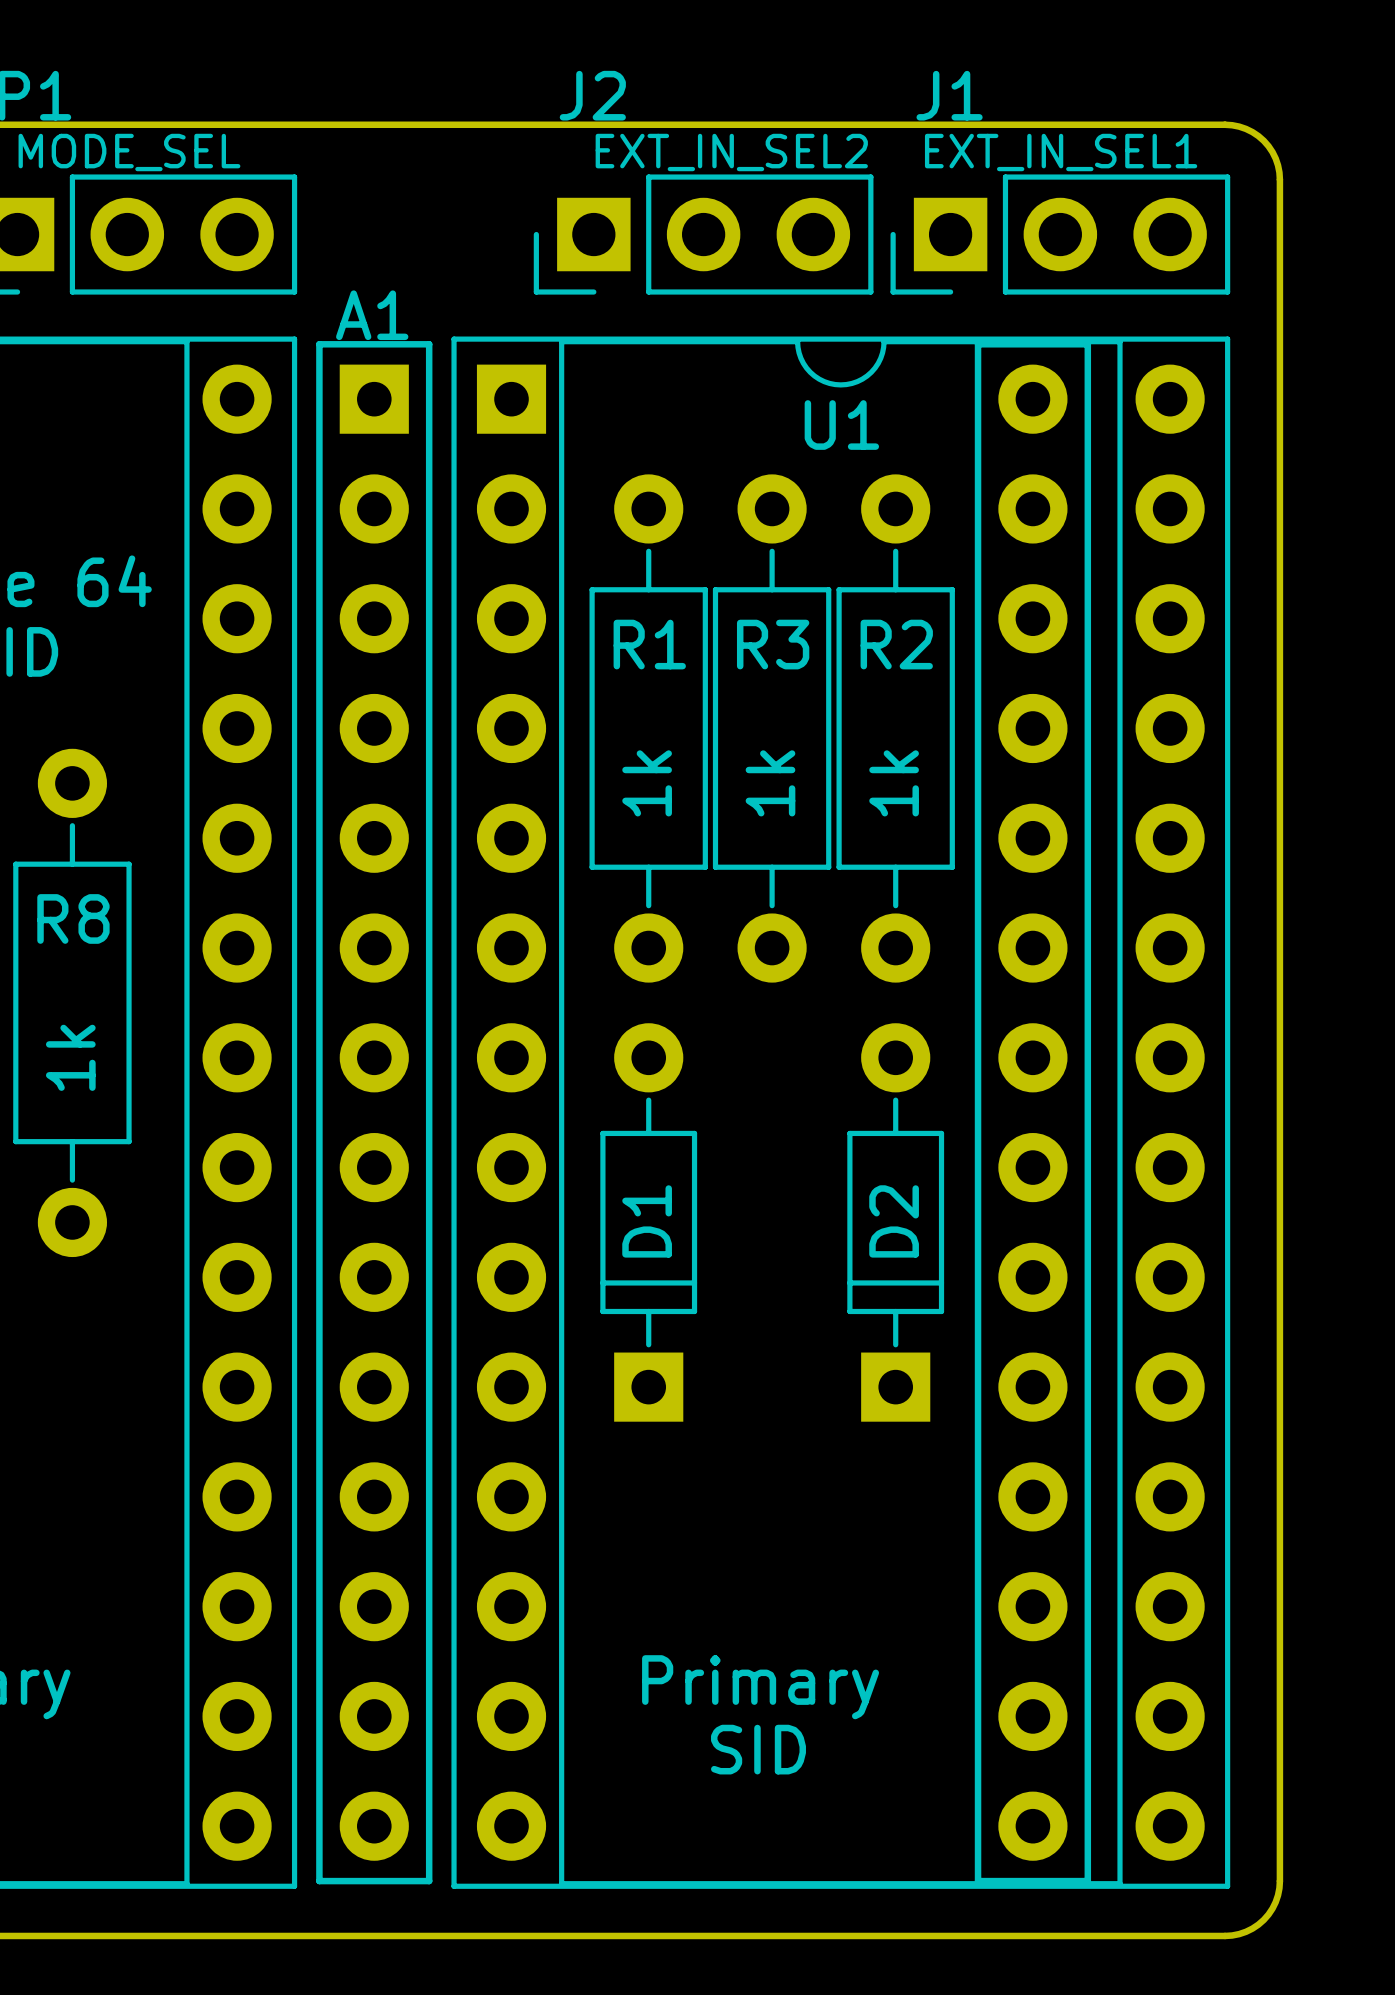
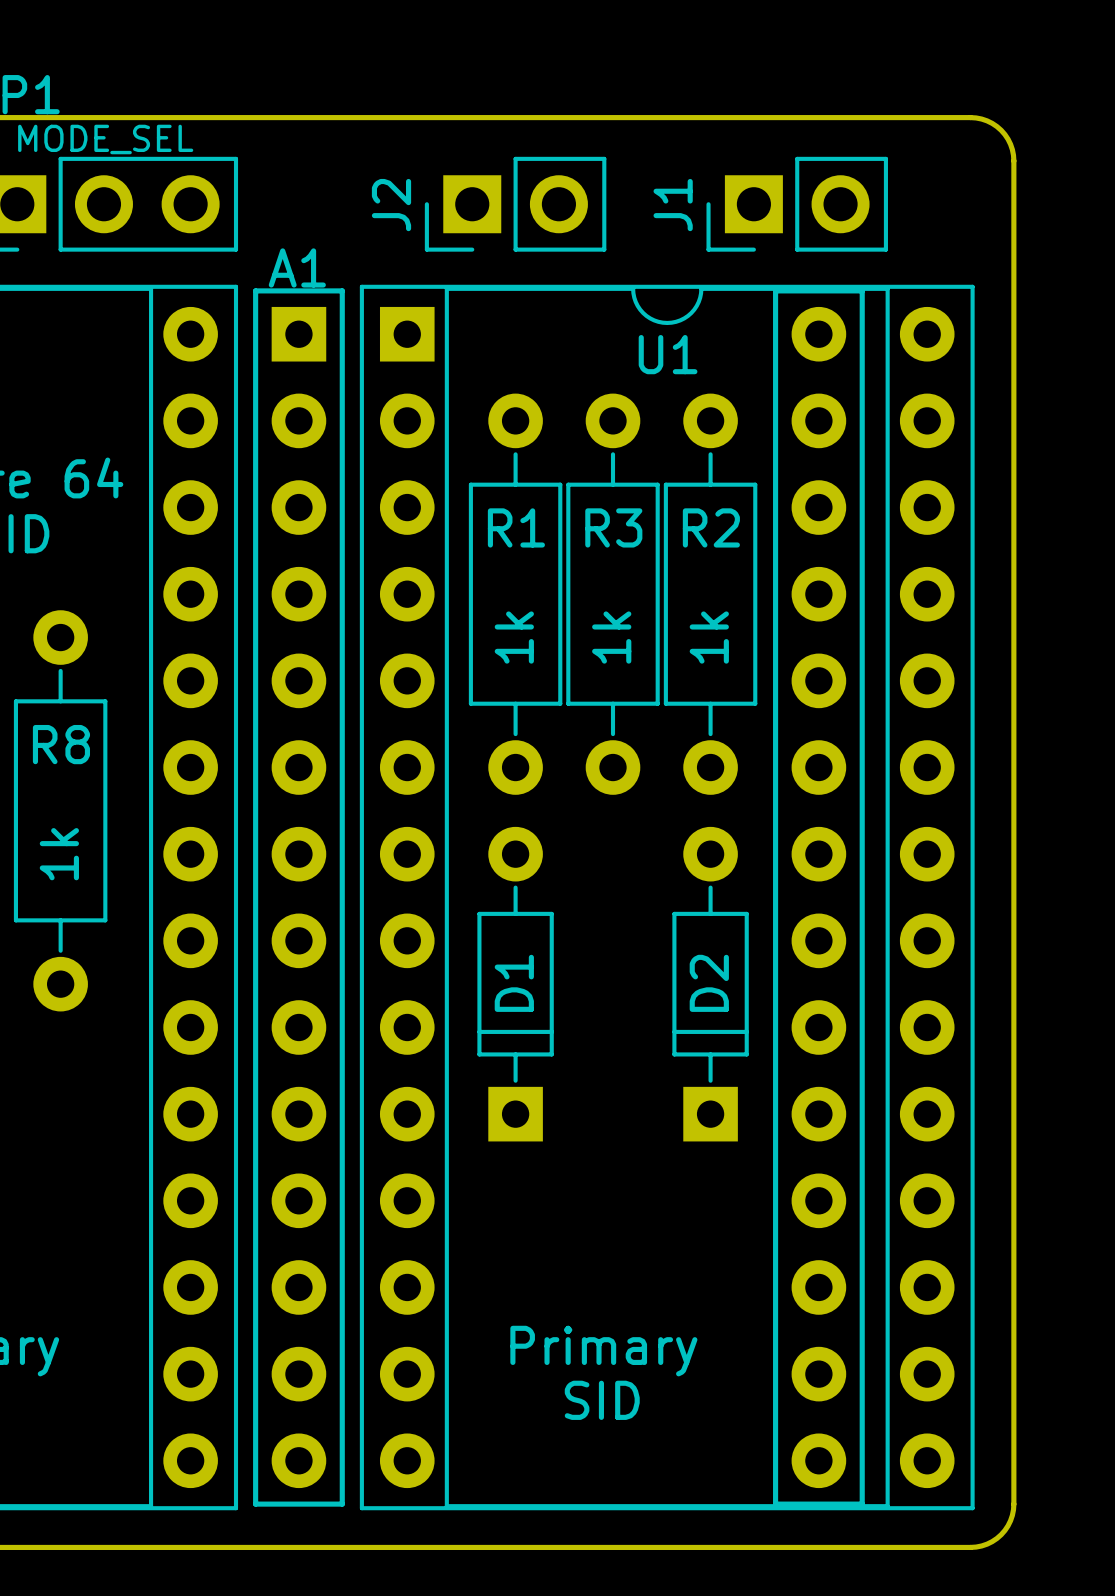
J2 name position: J2 (592, 95) -> J2 (391, 205)
J1 name position: J1 (949, 95) -> J1 (673, 205)
J2 value: EXT_IN_SEL2 (731, 152) -> none
J1 value: EXT_IN_SEL1 (1061, 152) -> none
J2 footprint: [533, 174, 874, 295] -> [424, 156, 607, 252]
J1 footprint: [890, 174, 1231, 295] -> [706, 156, 888, 252]

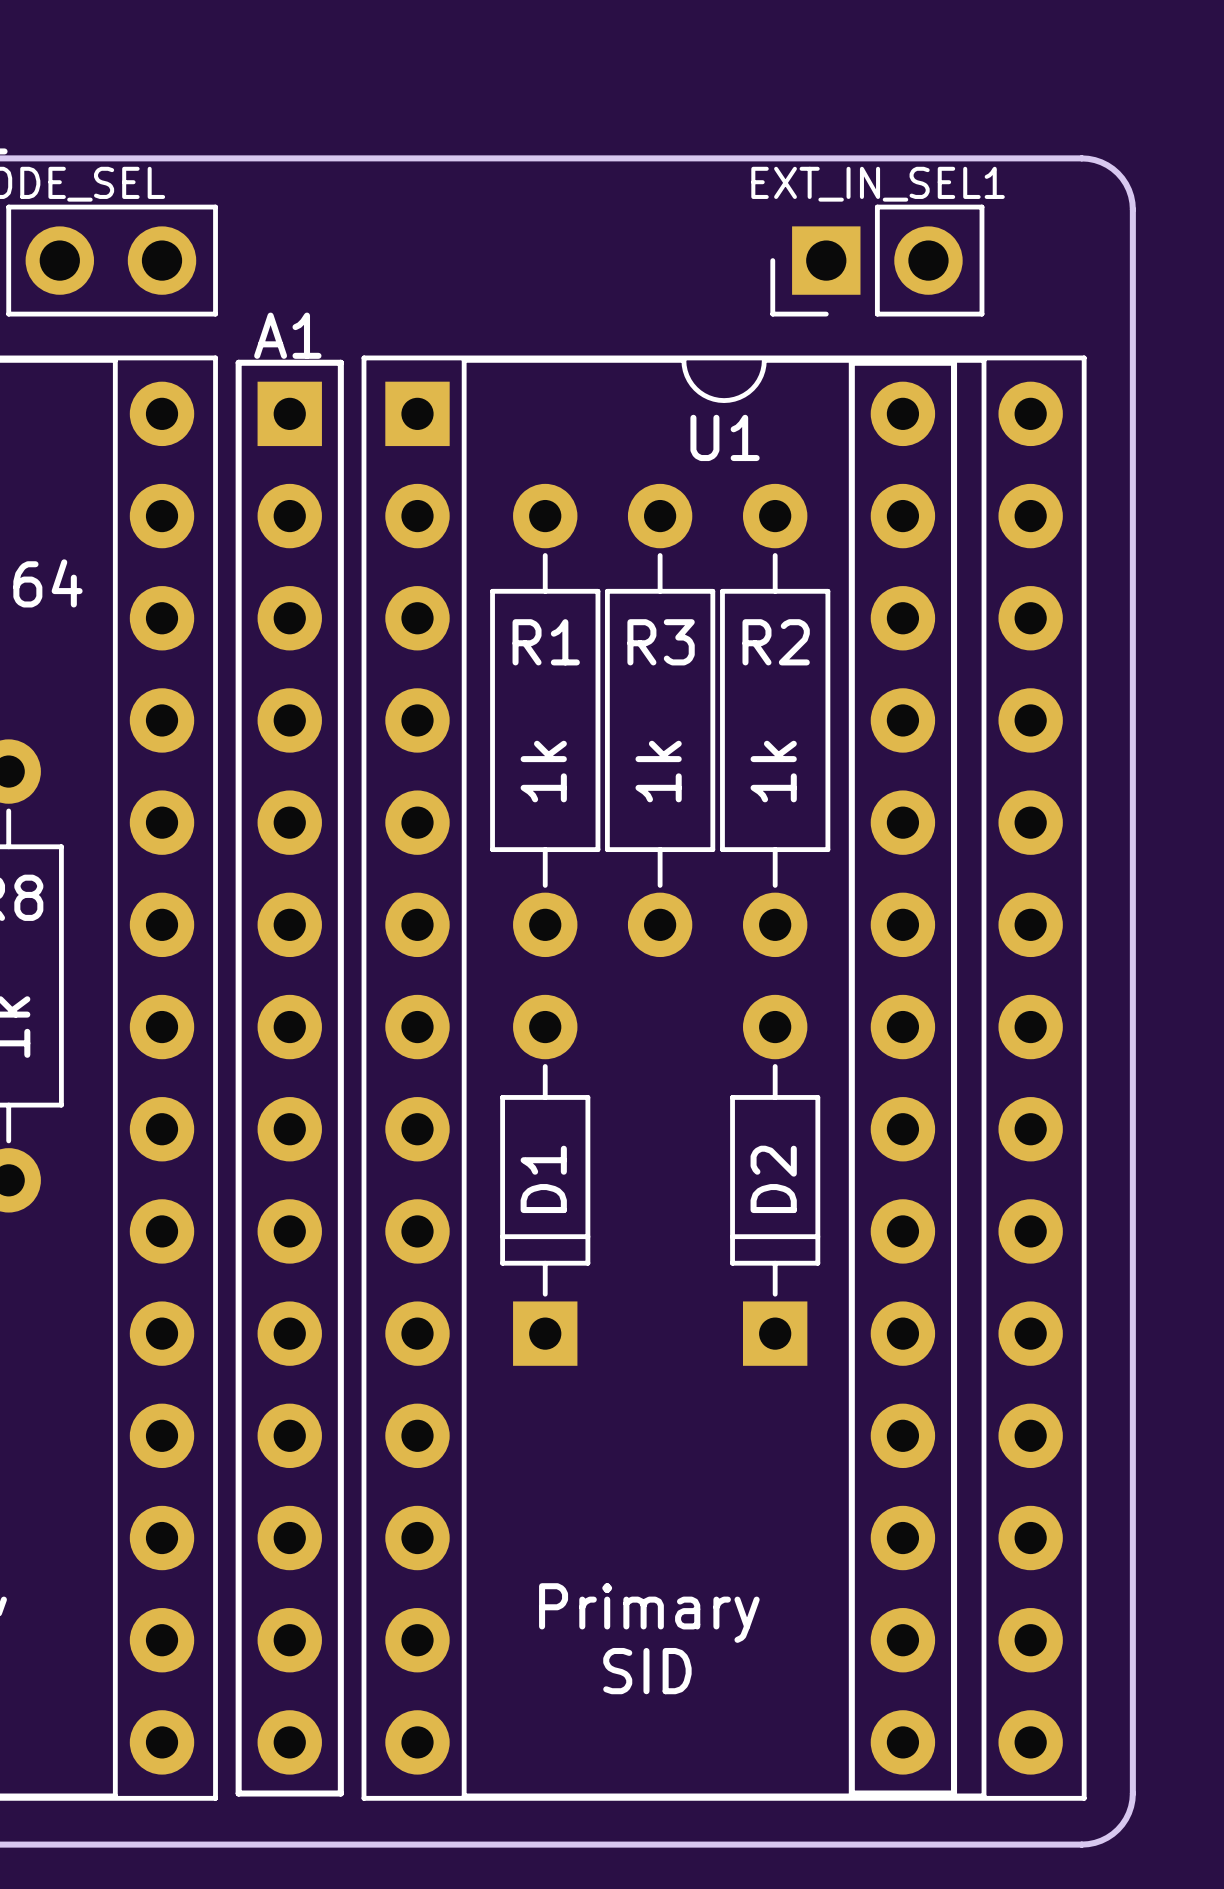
J1 value: none -> EXT_IN_SEL1 (878, 184)
J2: (515, 204) -> none
J1 name: J1 (673, 205) -> none

